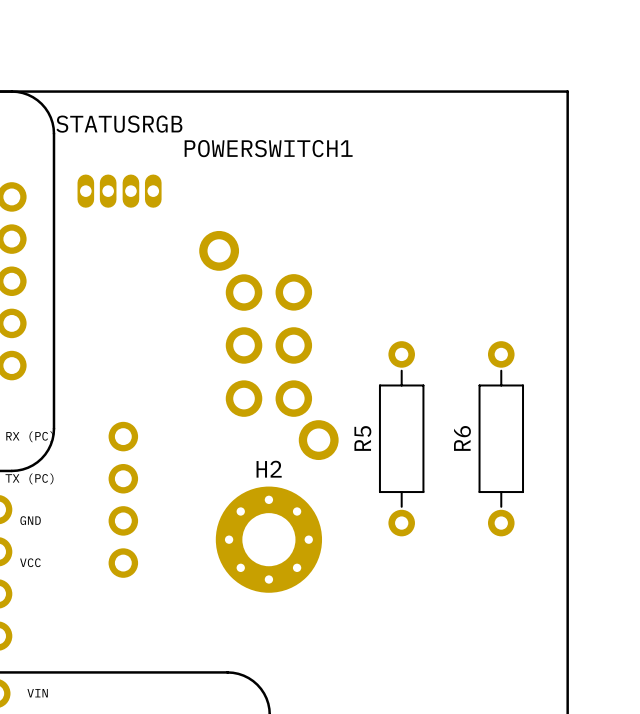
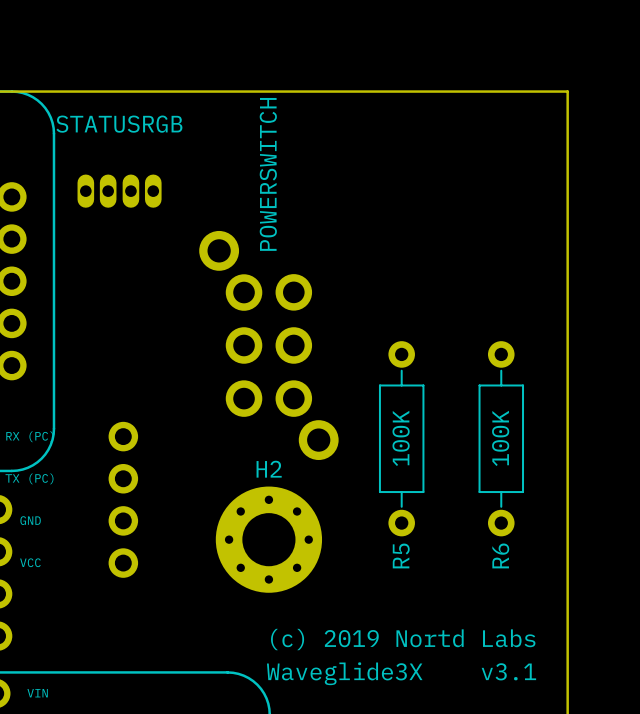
POWERSWITCH1 name: POWERSWITCH1 (268, 148) -> none
POWERSWITCH1 value: none -> POWERSWITCH (268, 174)
R5 name position: R5 (362, 438) -> R5 (401, 555)
R5 value: none -> 100K (401, 438)
R6 name position: R6 (462, 438) -> R6 (500, 555)
R6 value: none -> 100K (500, 438)
text: none -> (c) 2019 Nortd Labs (403, 639)
text: none -> Waveglide3X v3.1 (401, 673)

